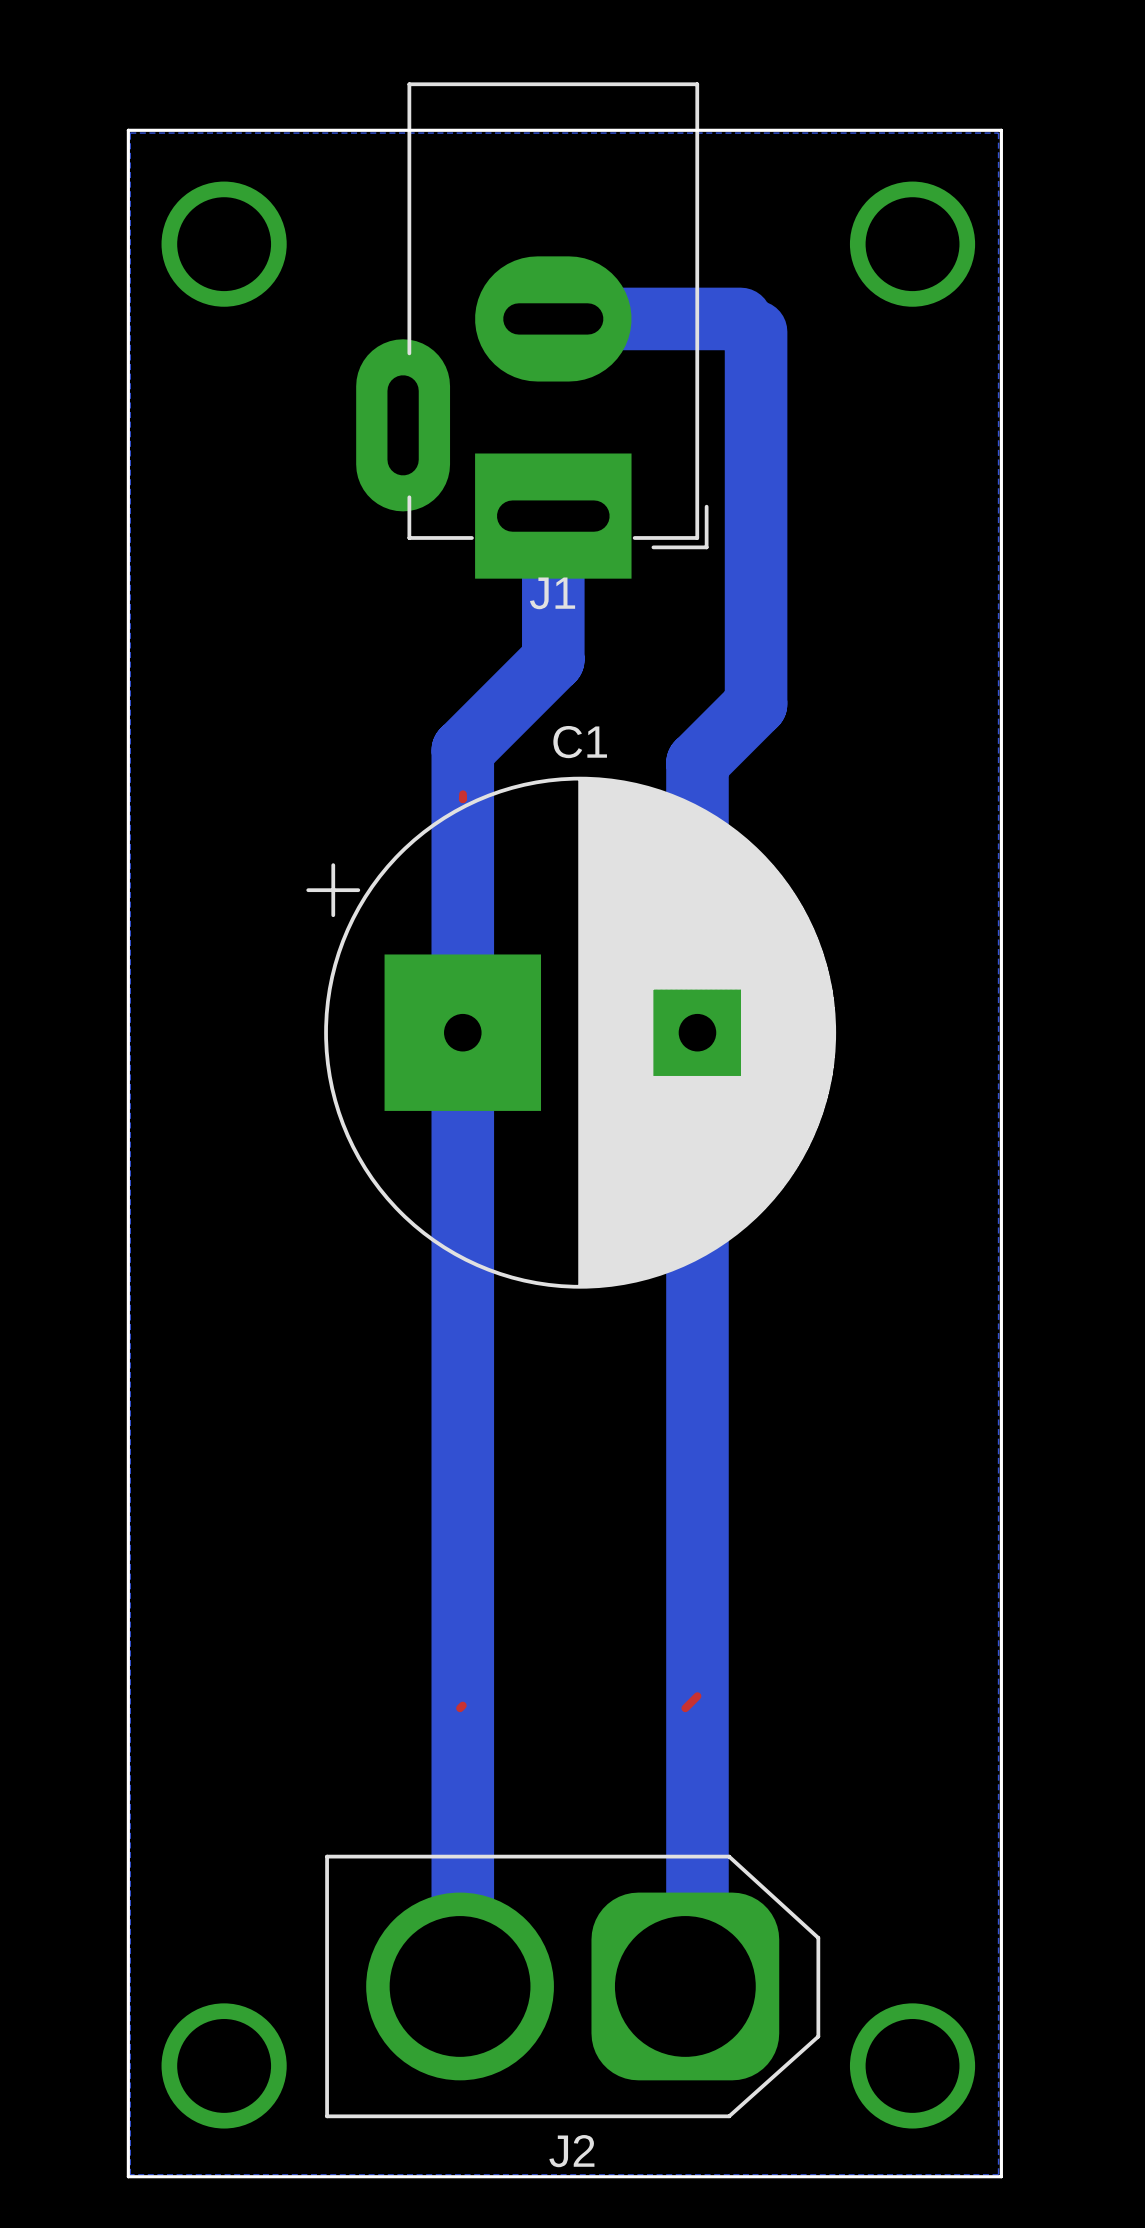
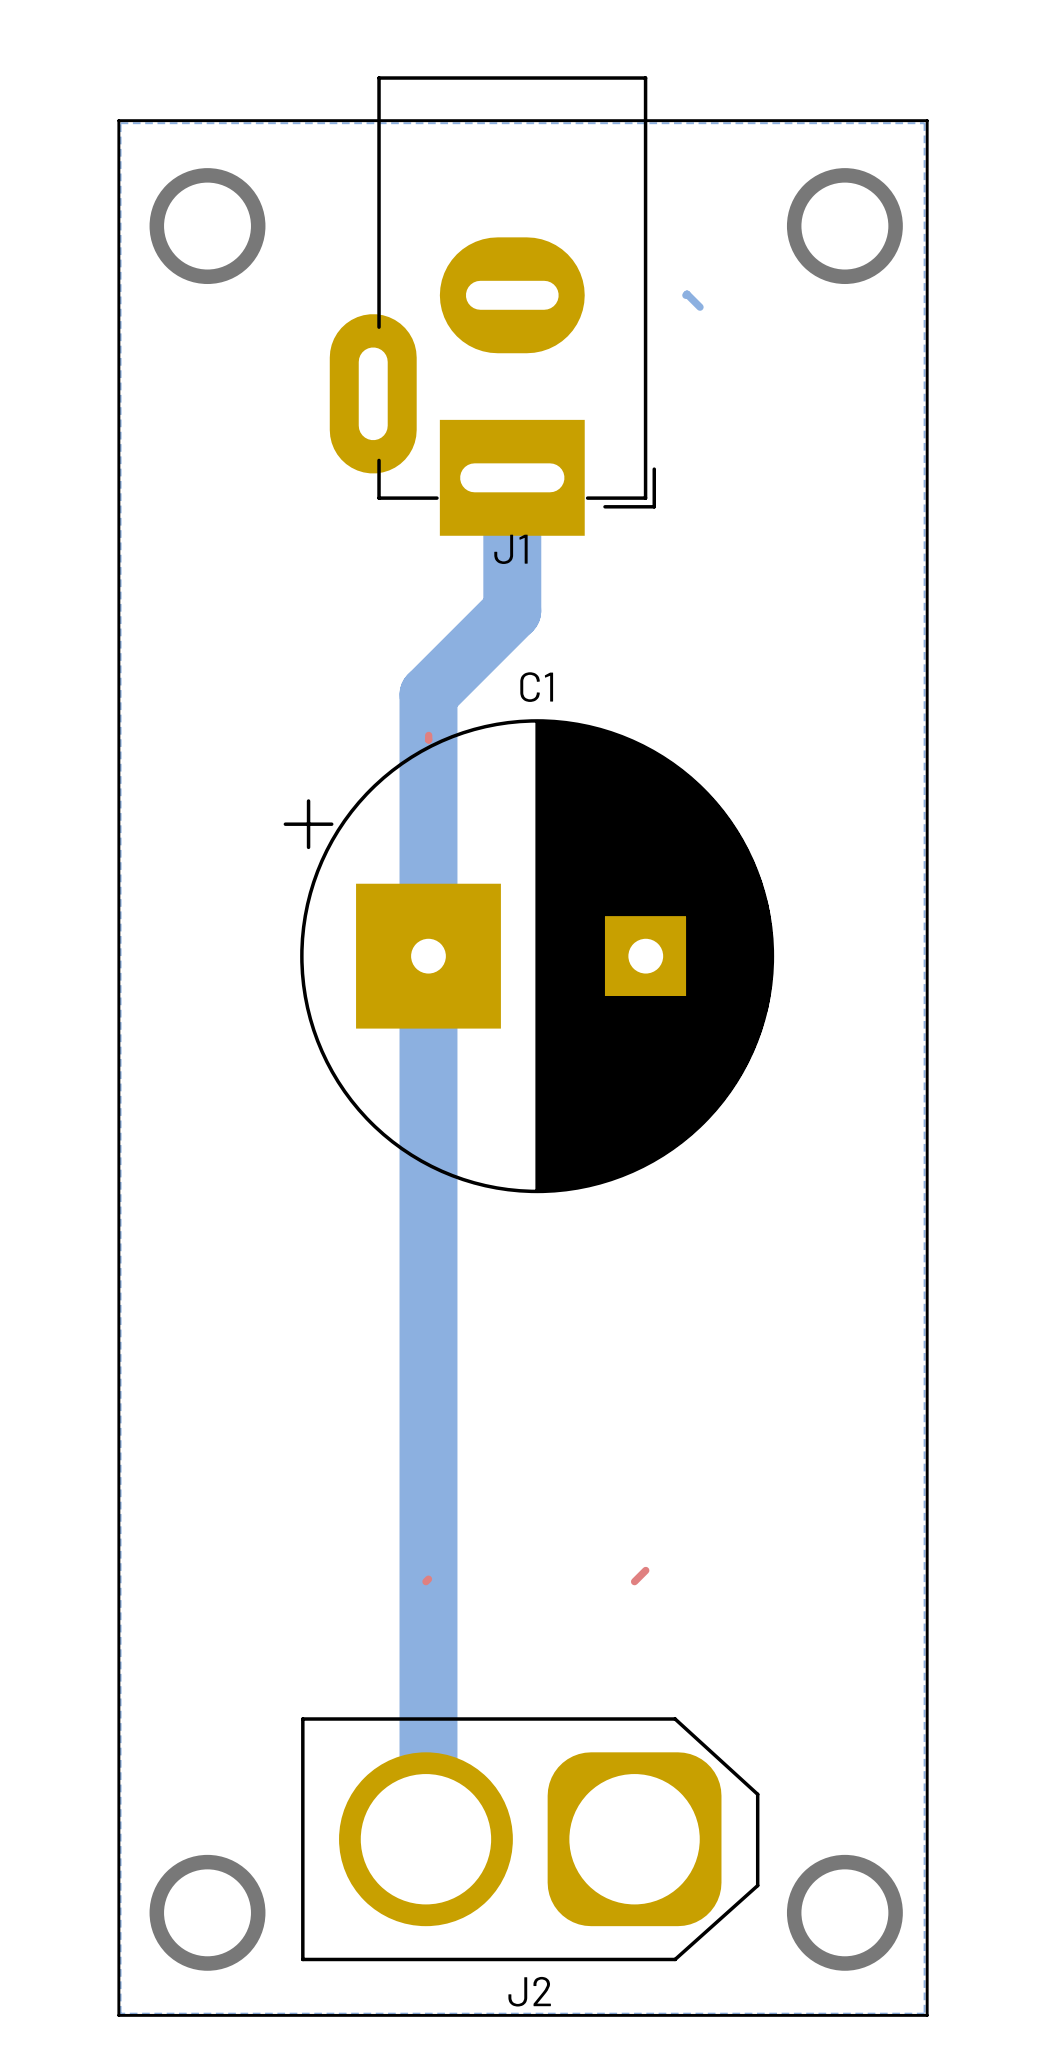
bottom track: (553, 318) (740, 318) -> none
bottom track: (756, 331) (756, 704) (697, 762) (697, 1974) -> none

